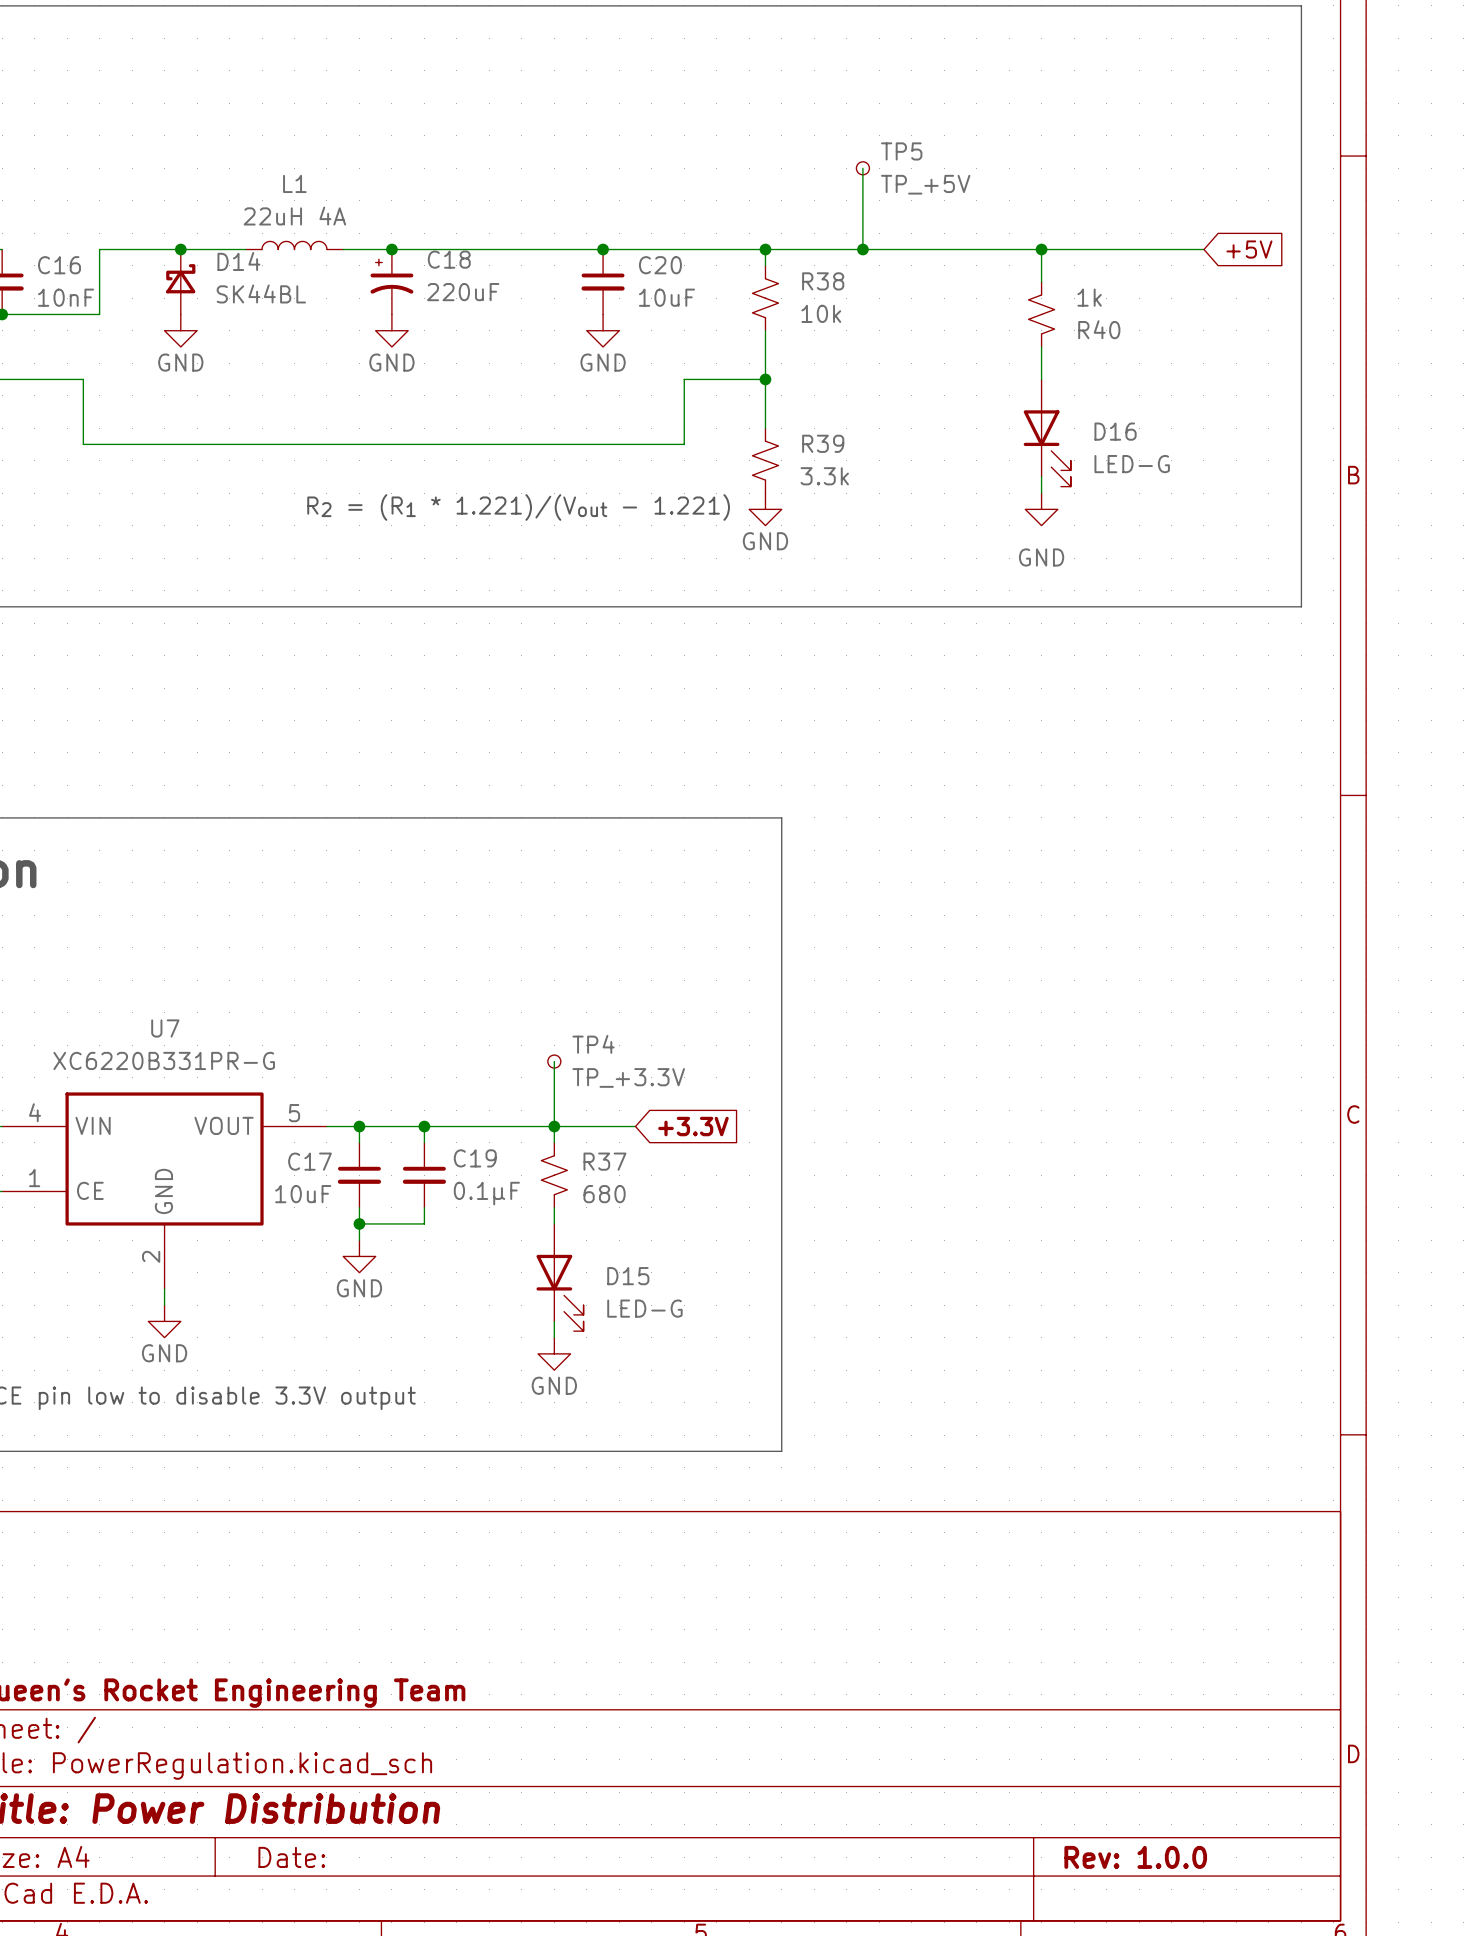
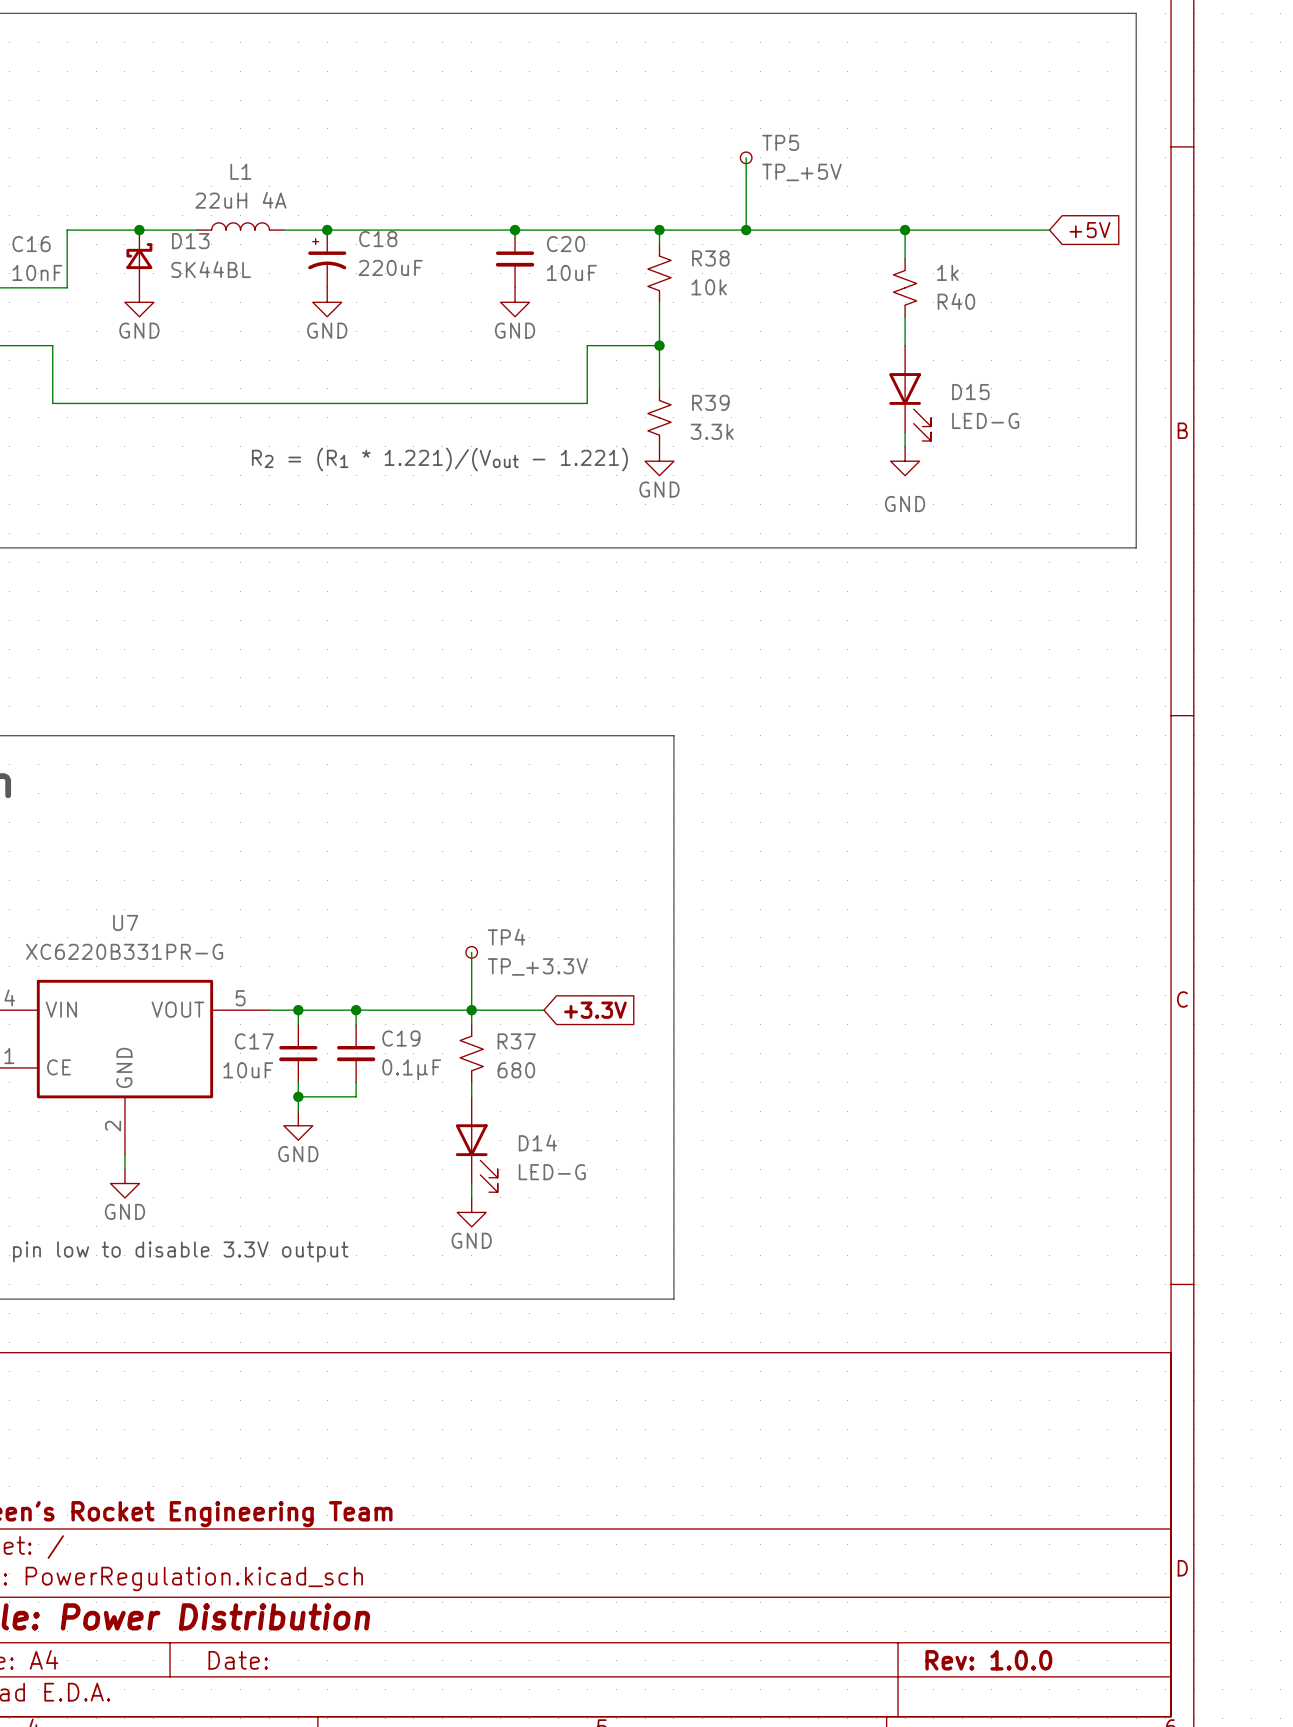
D14 name: D14 (238, 261) -> D13 (190, 241)
D16 name: D16 (1115, 431) -> D15 (970, 392)
D15 name: D15 (628, 1276) -> D14 (537, 1142)

